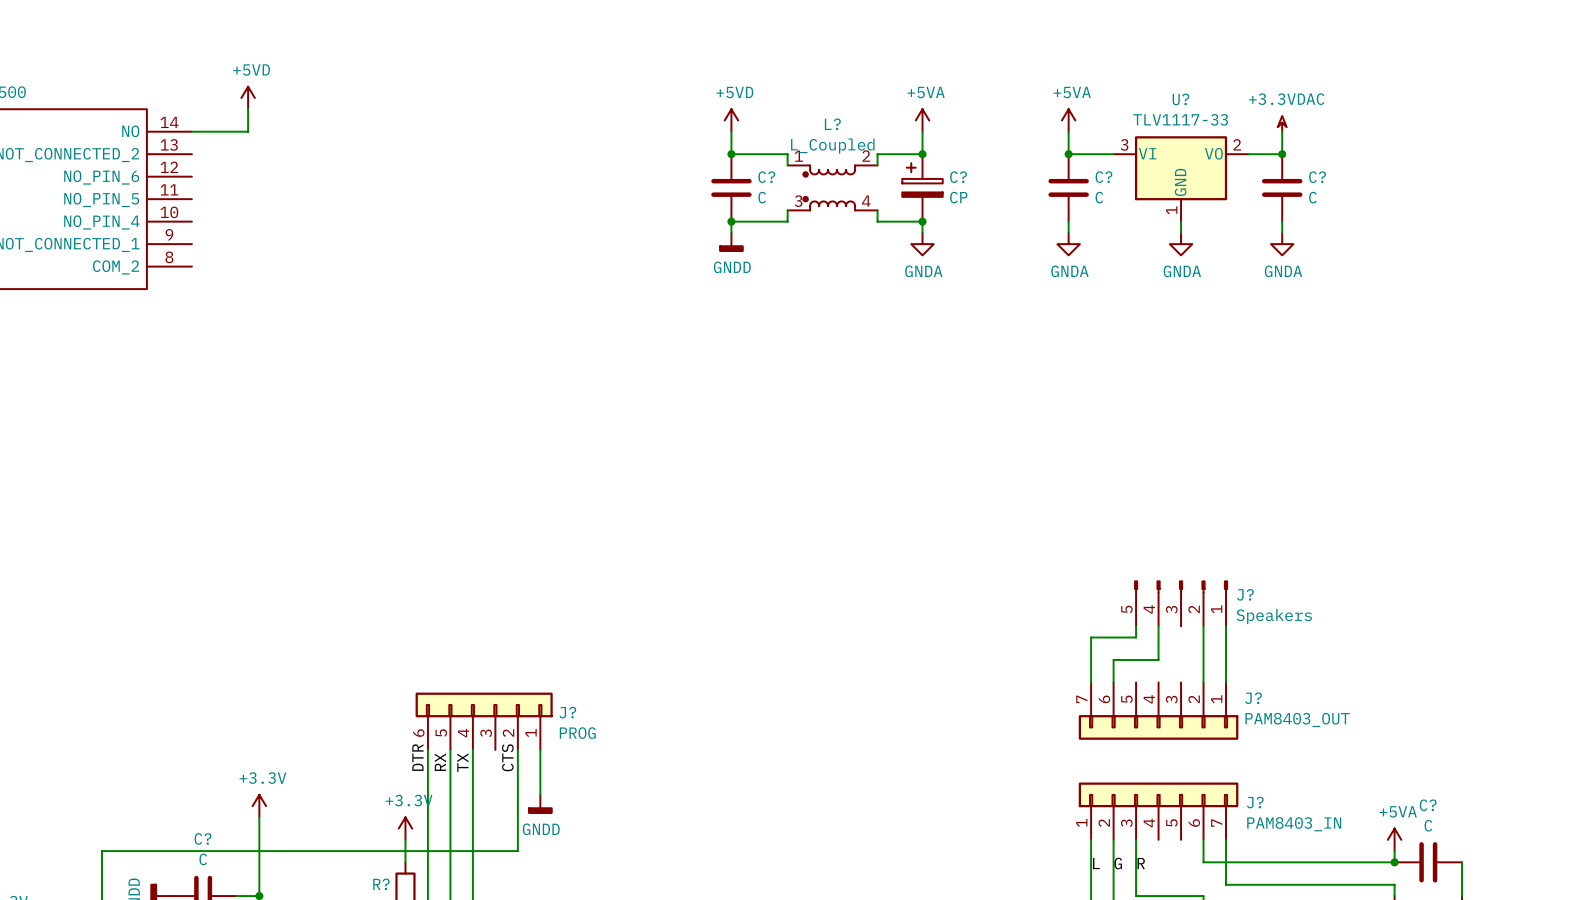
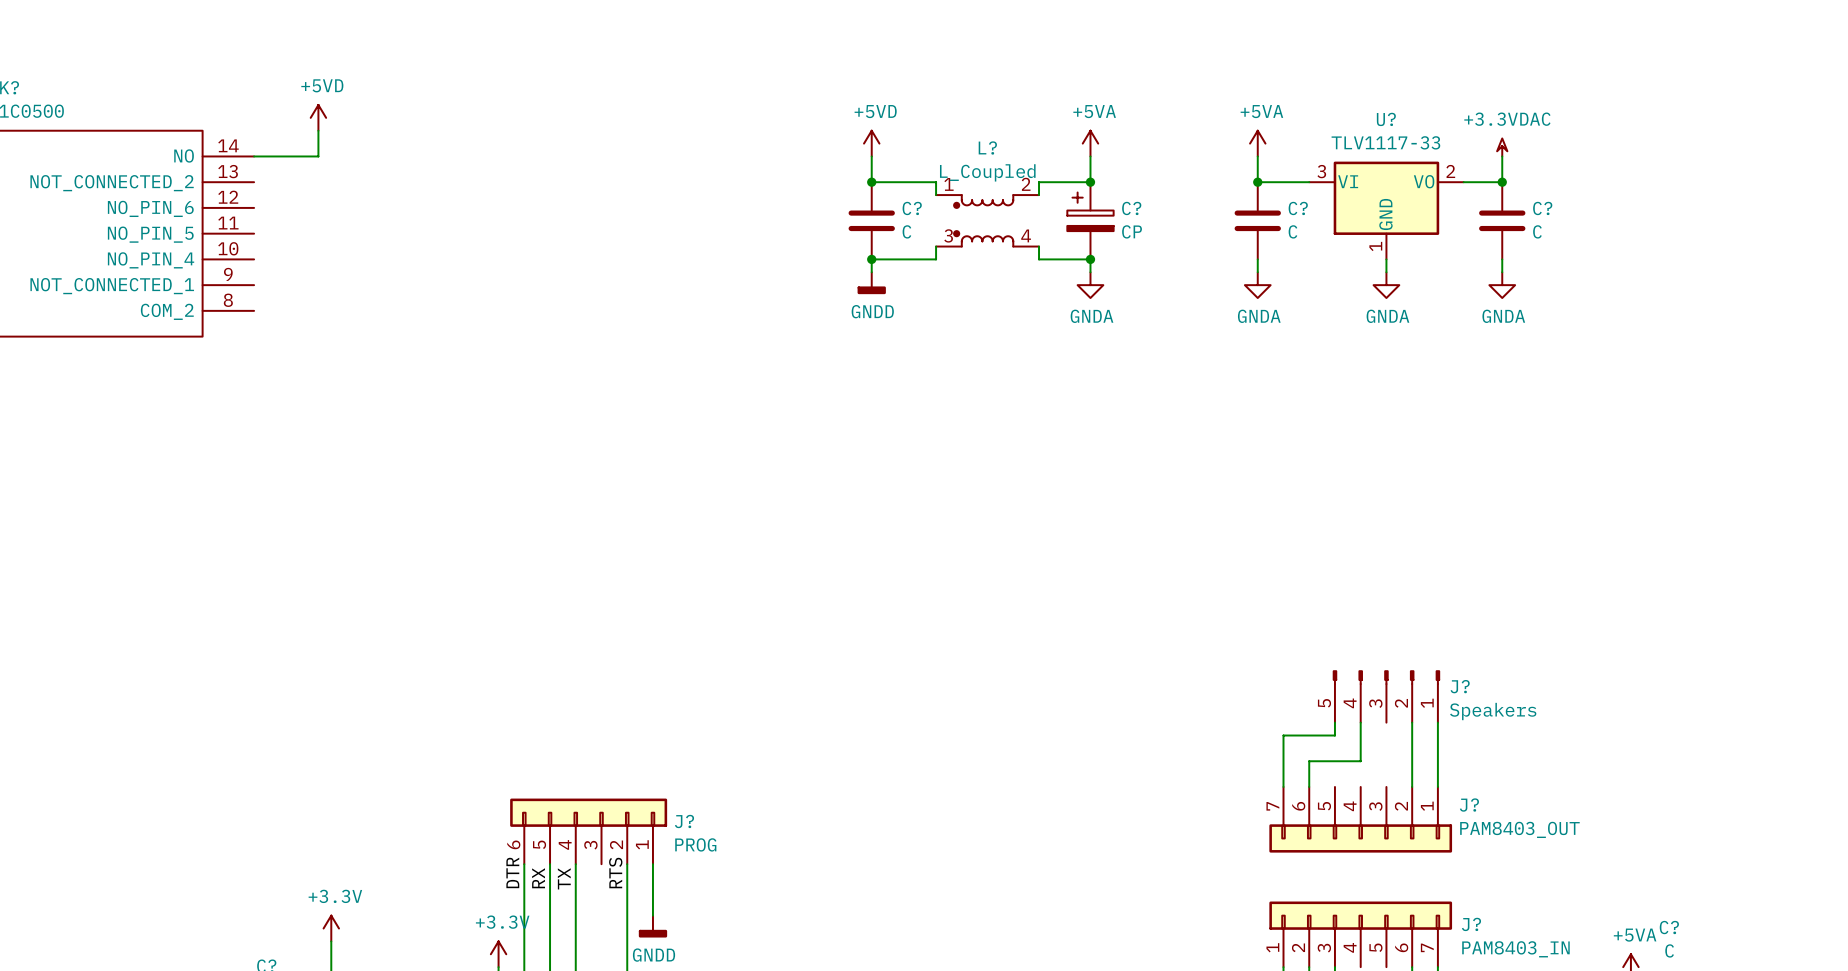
label: CTS (507, 757) -> RTS (615, 873)

